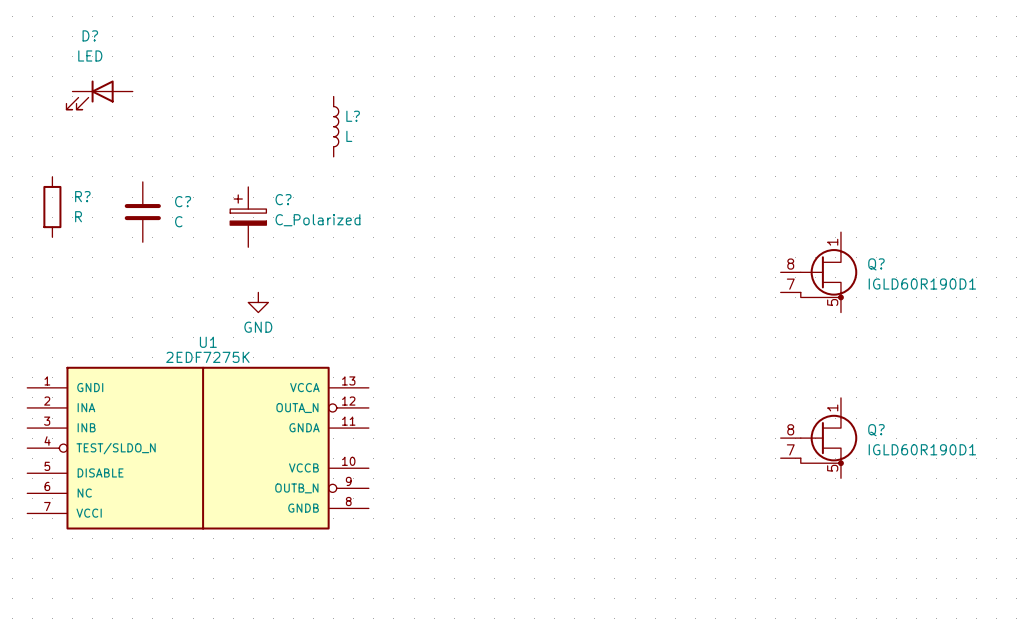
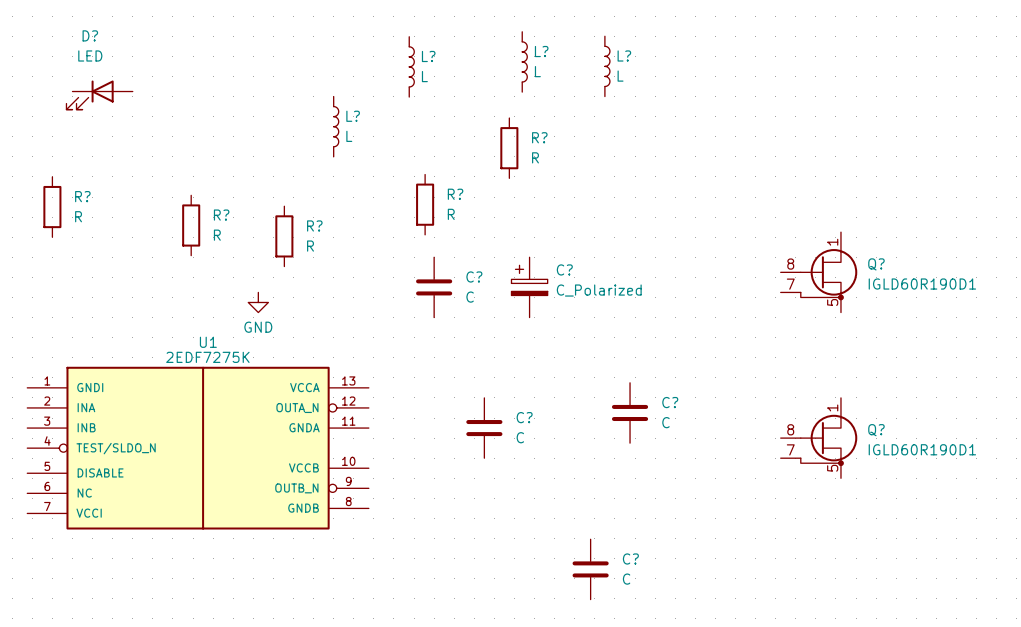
L?: none -> L (524, 61)
L?: none -> L (411, 66)
L?: none -> L (607, 66)
R?: none -> R (509, 148)
R?: none -> R (425, 204)
C?: C (142, 212) -> none
C?: C_Polarized (248, 217) -> none
R?: none -> R (191, 225)
R?: none -> R (284, 236)
C?: none -> C (434, 287)
C?: none -> C_Polarized (529, 287)
C?: none -> C (630, 412)
C?: none -> C (484, 428)
C?: none -> C (590, 569)

